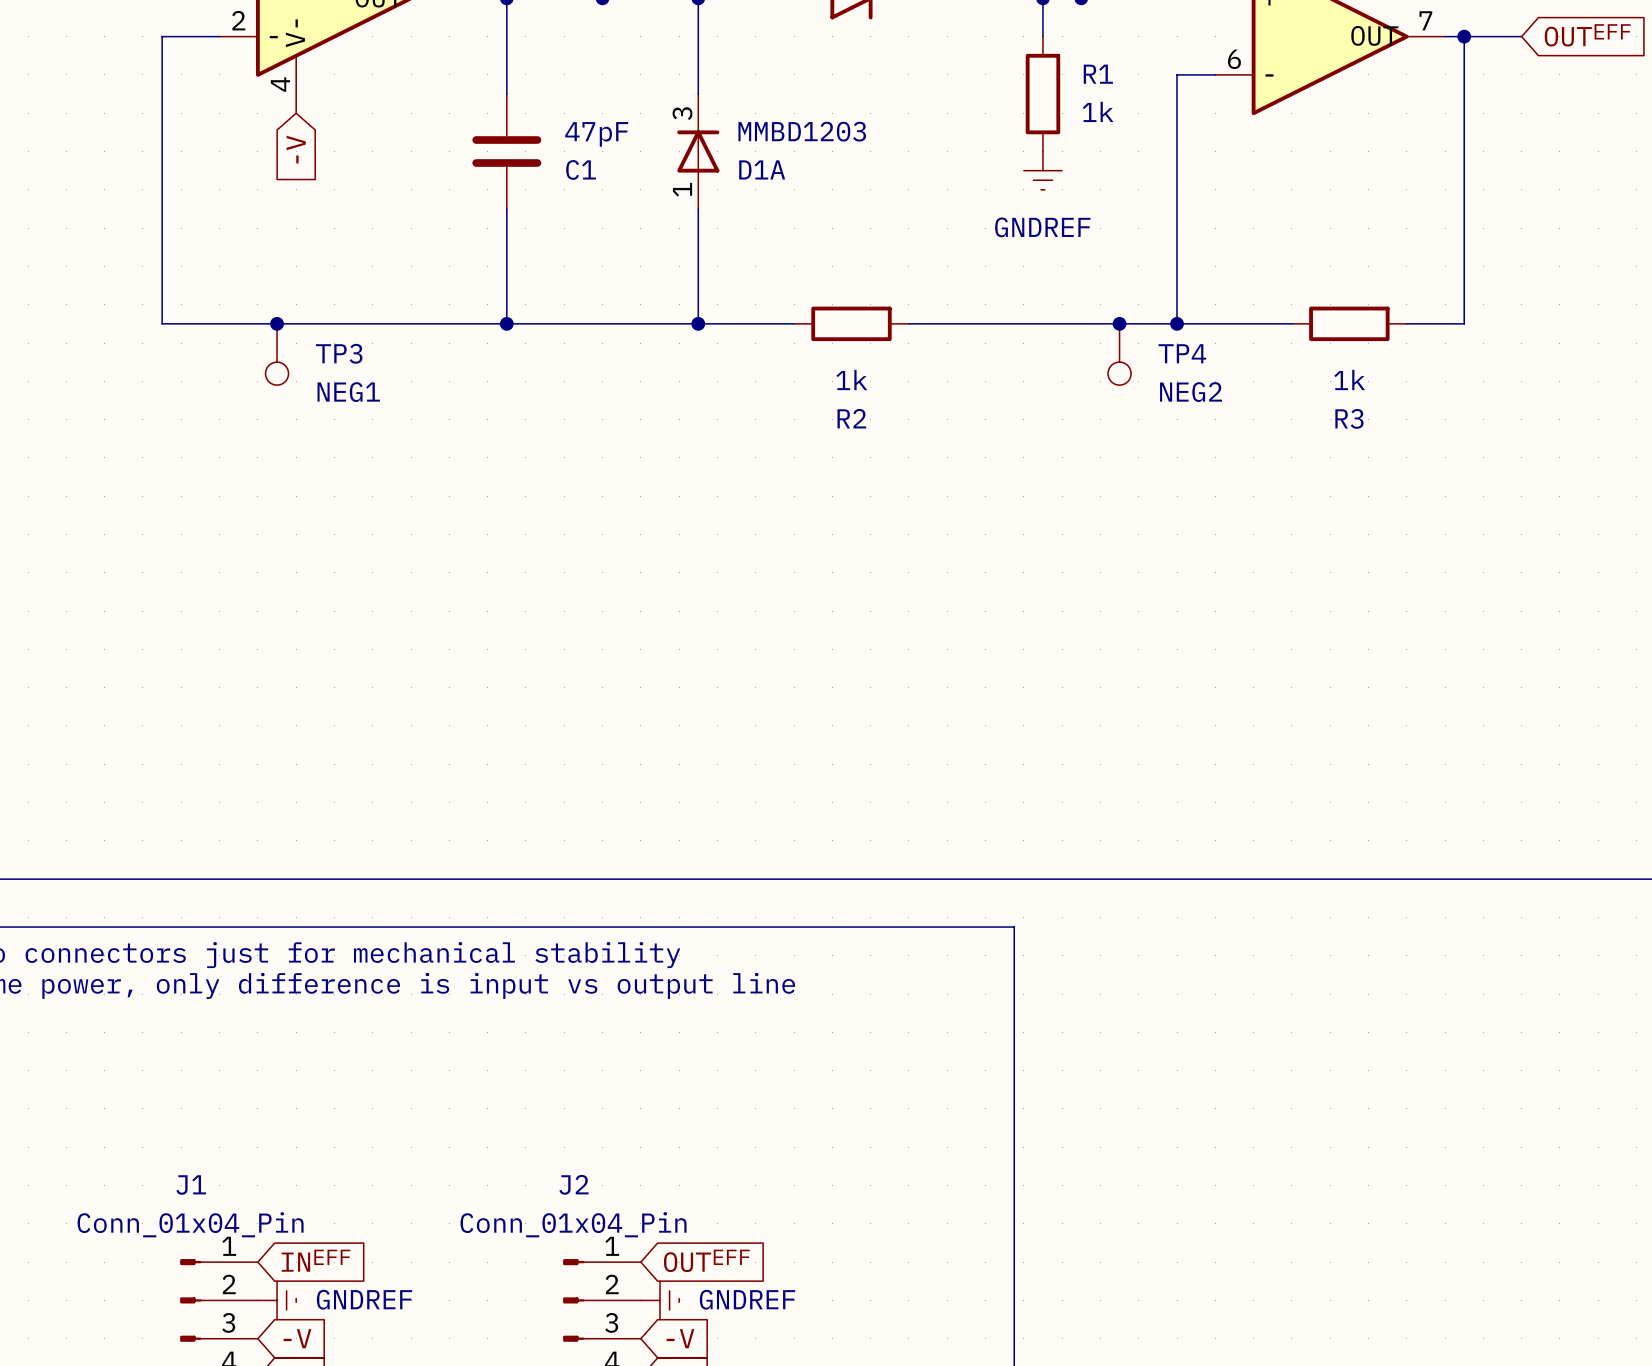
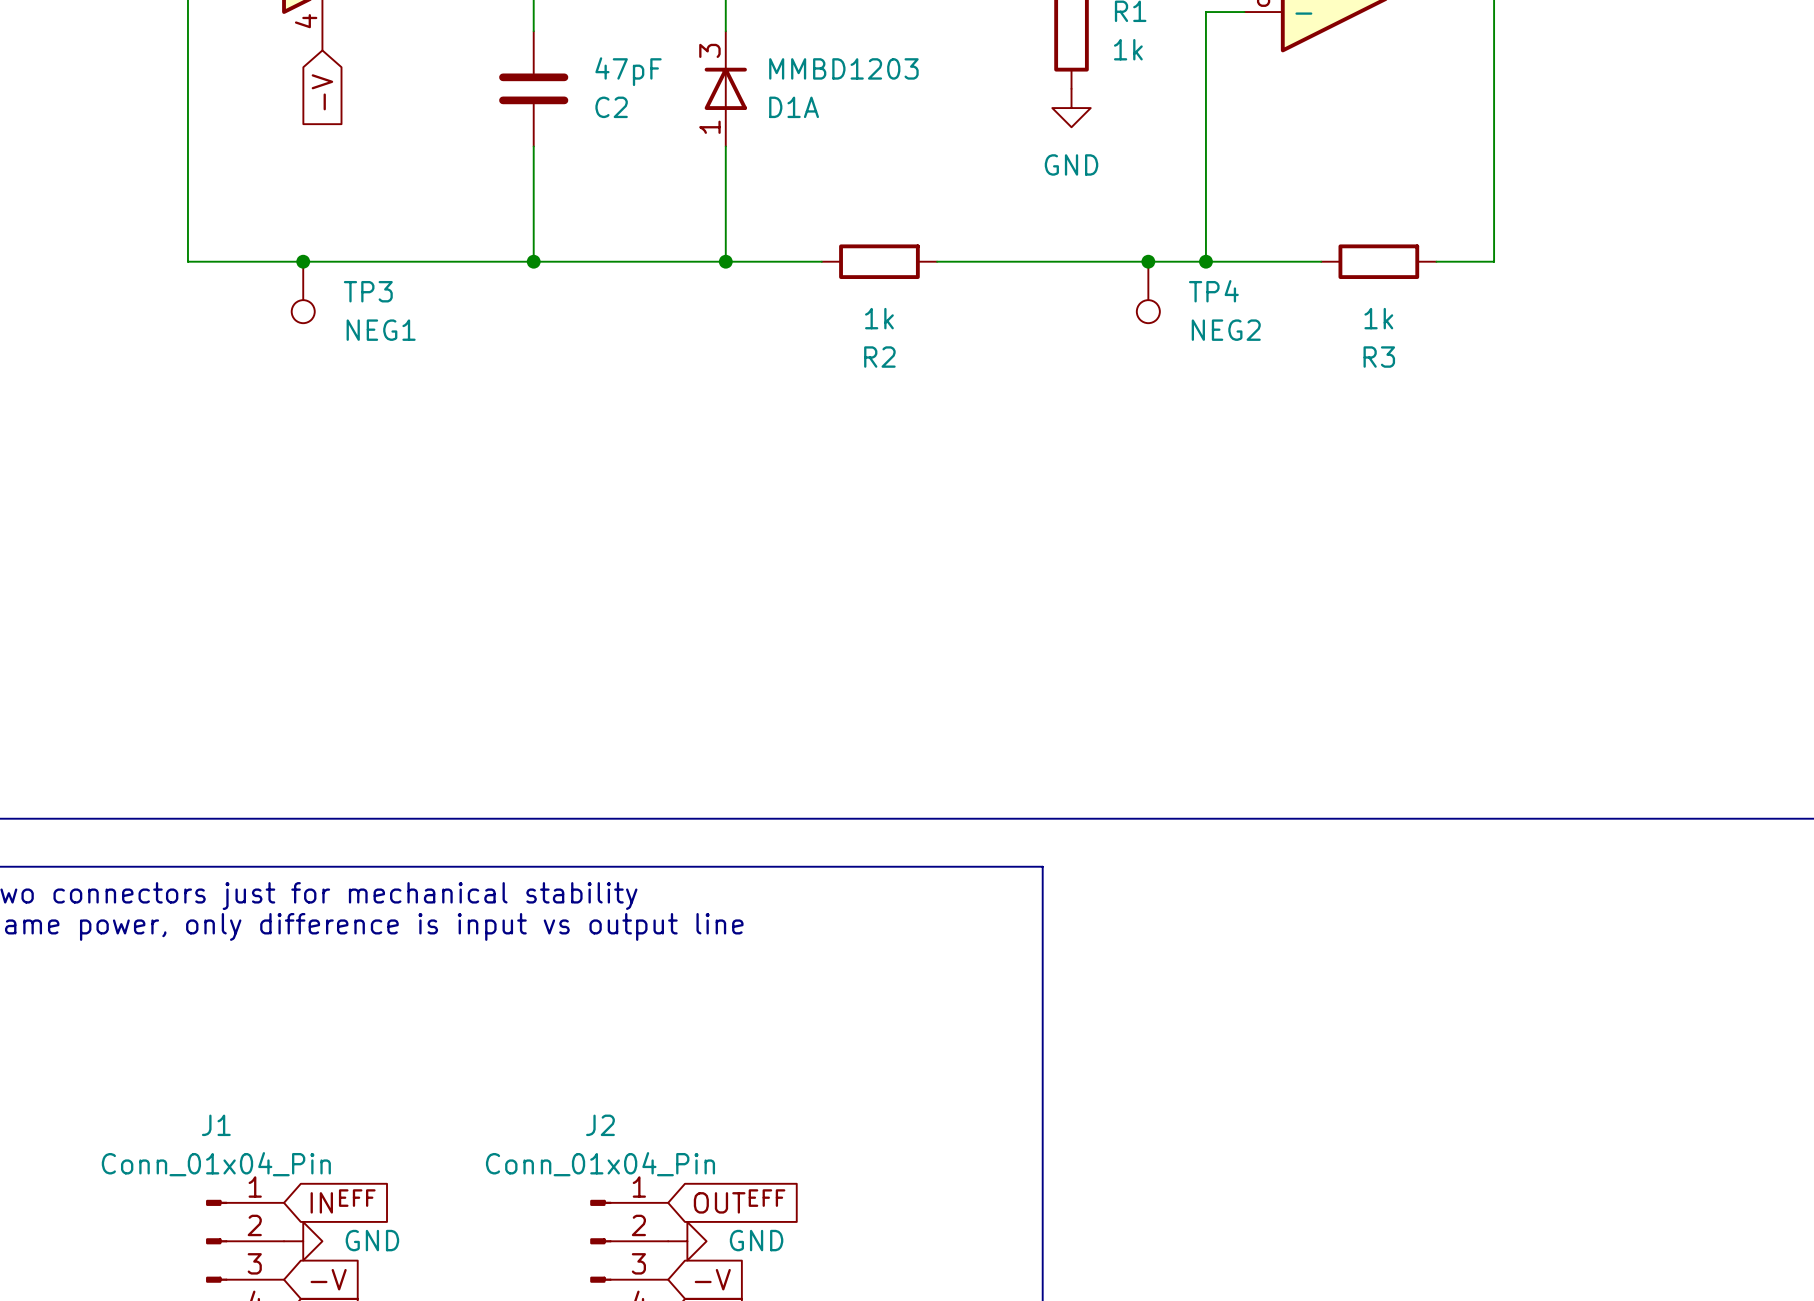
C1 name: C1 (581, 169) -> C2 (611, 107)
power symbol: GNDREF (1042, 170) -> GND (1071, 108)
power symbol: GNDREF (277, 1300) -> GND (303, 1241)
power symbol: GNDREF (660, 1300) -> GND (687, 1241)

